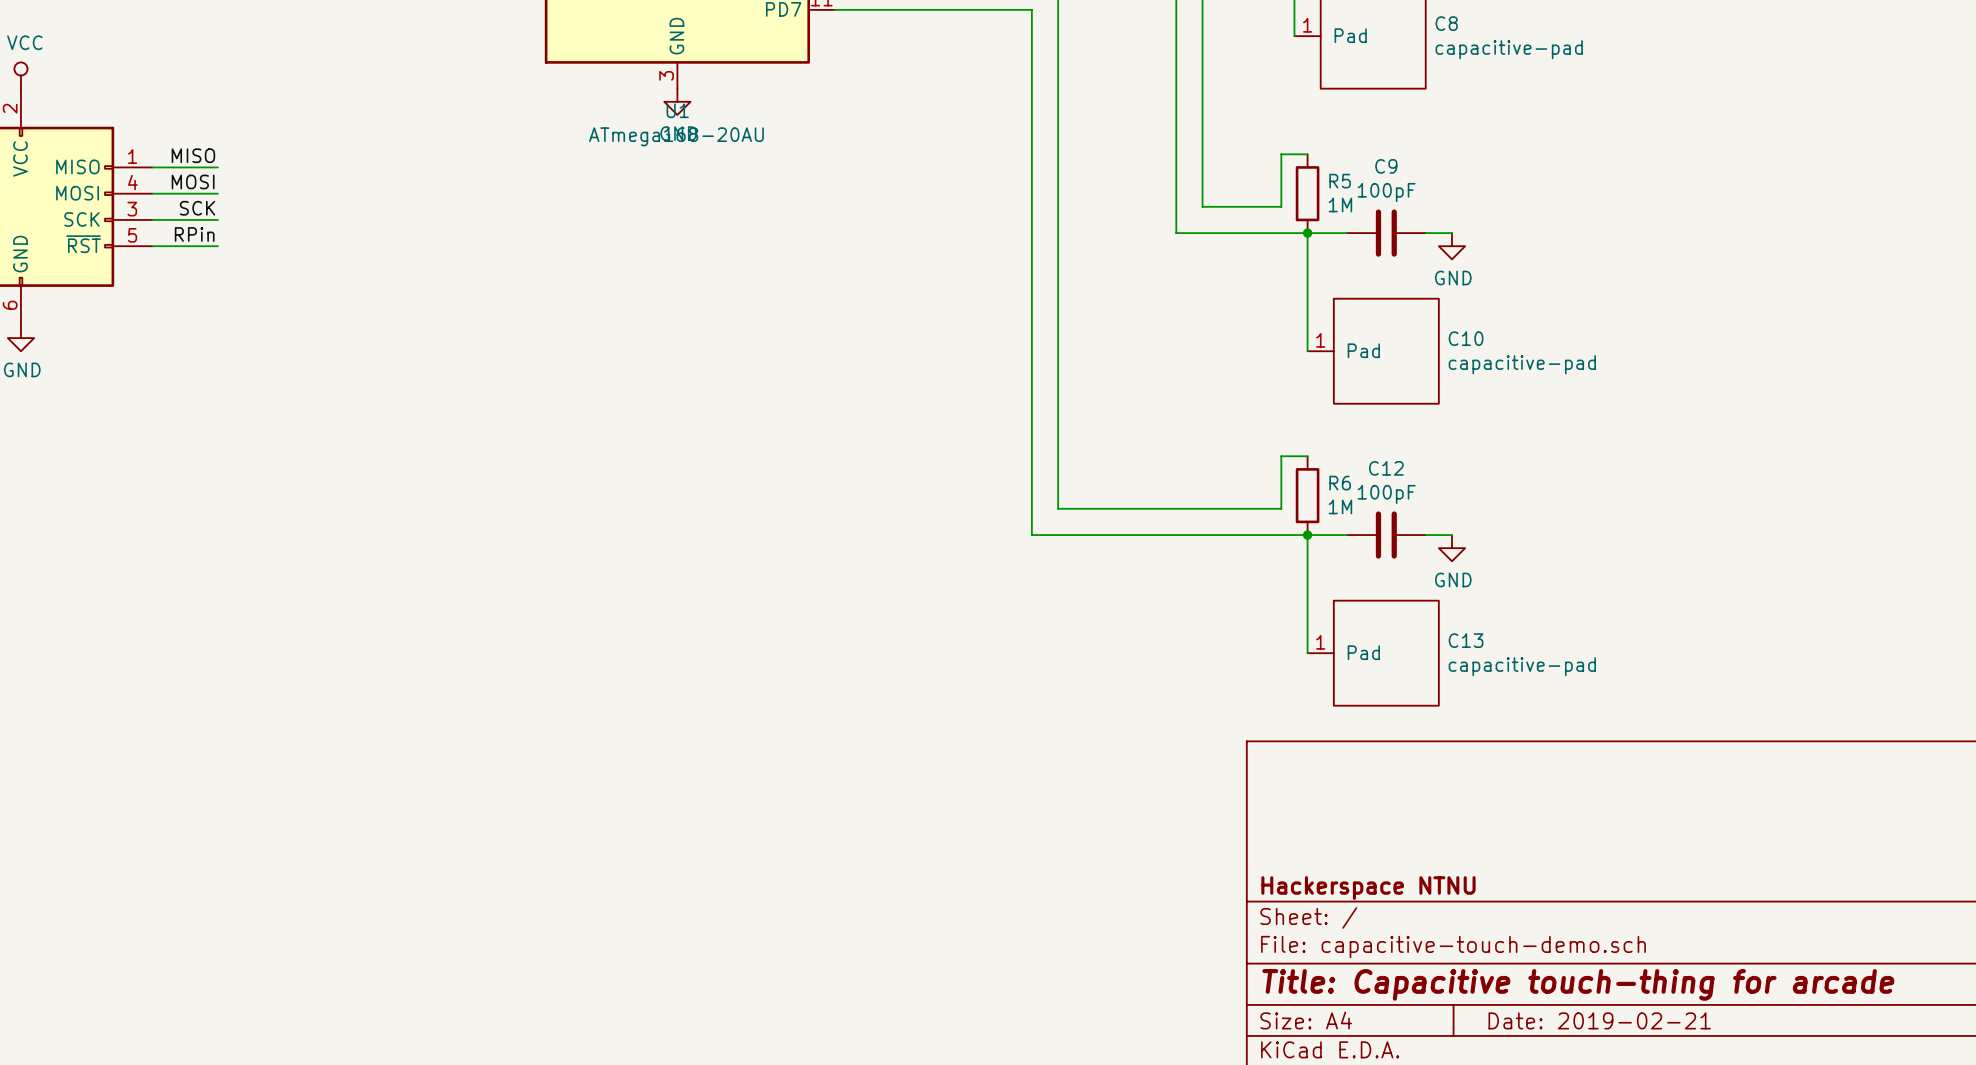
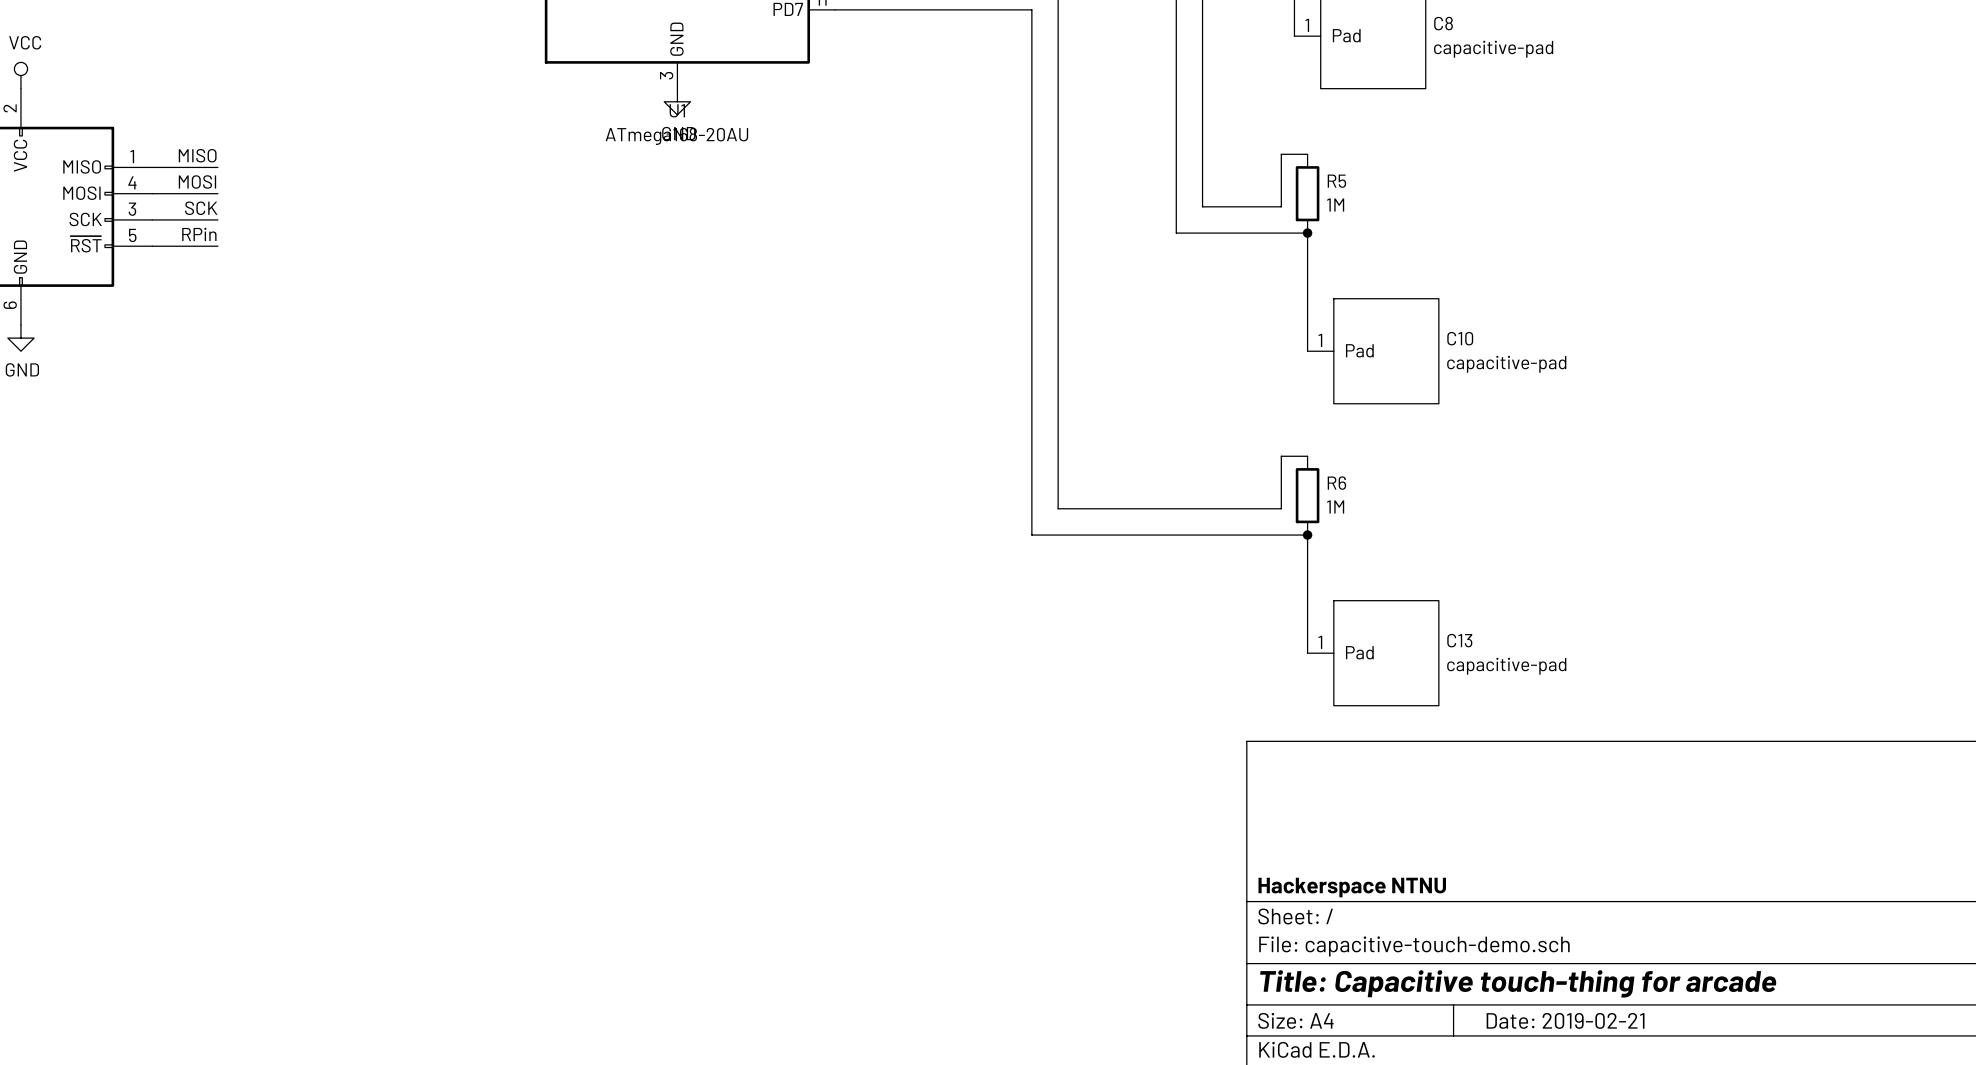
wire: (1307, 233) (1346, 233) -> none
C9: 100pF (1386, 233) -> none
wire: (1425, 233) (1451, 233) -> none
power symbol: GND (1451, 246) -> none
wire: (1307, 535) (1346, 535) -> none
C12: 100pF (1386, 535) -> none
wire: (1425, 535) (1451, 535) -> none
power symbol: GND (1451, 548) -> none

